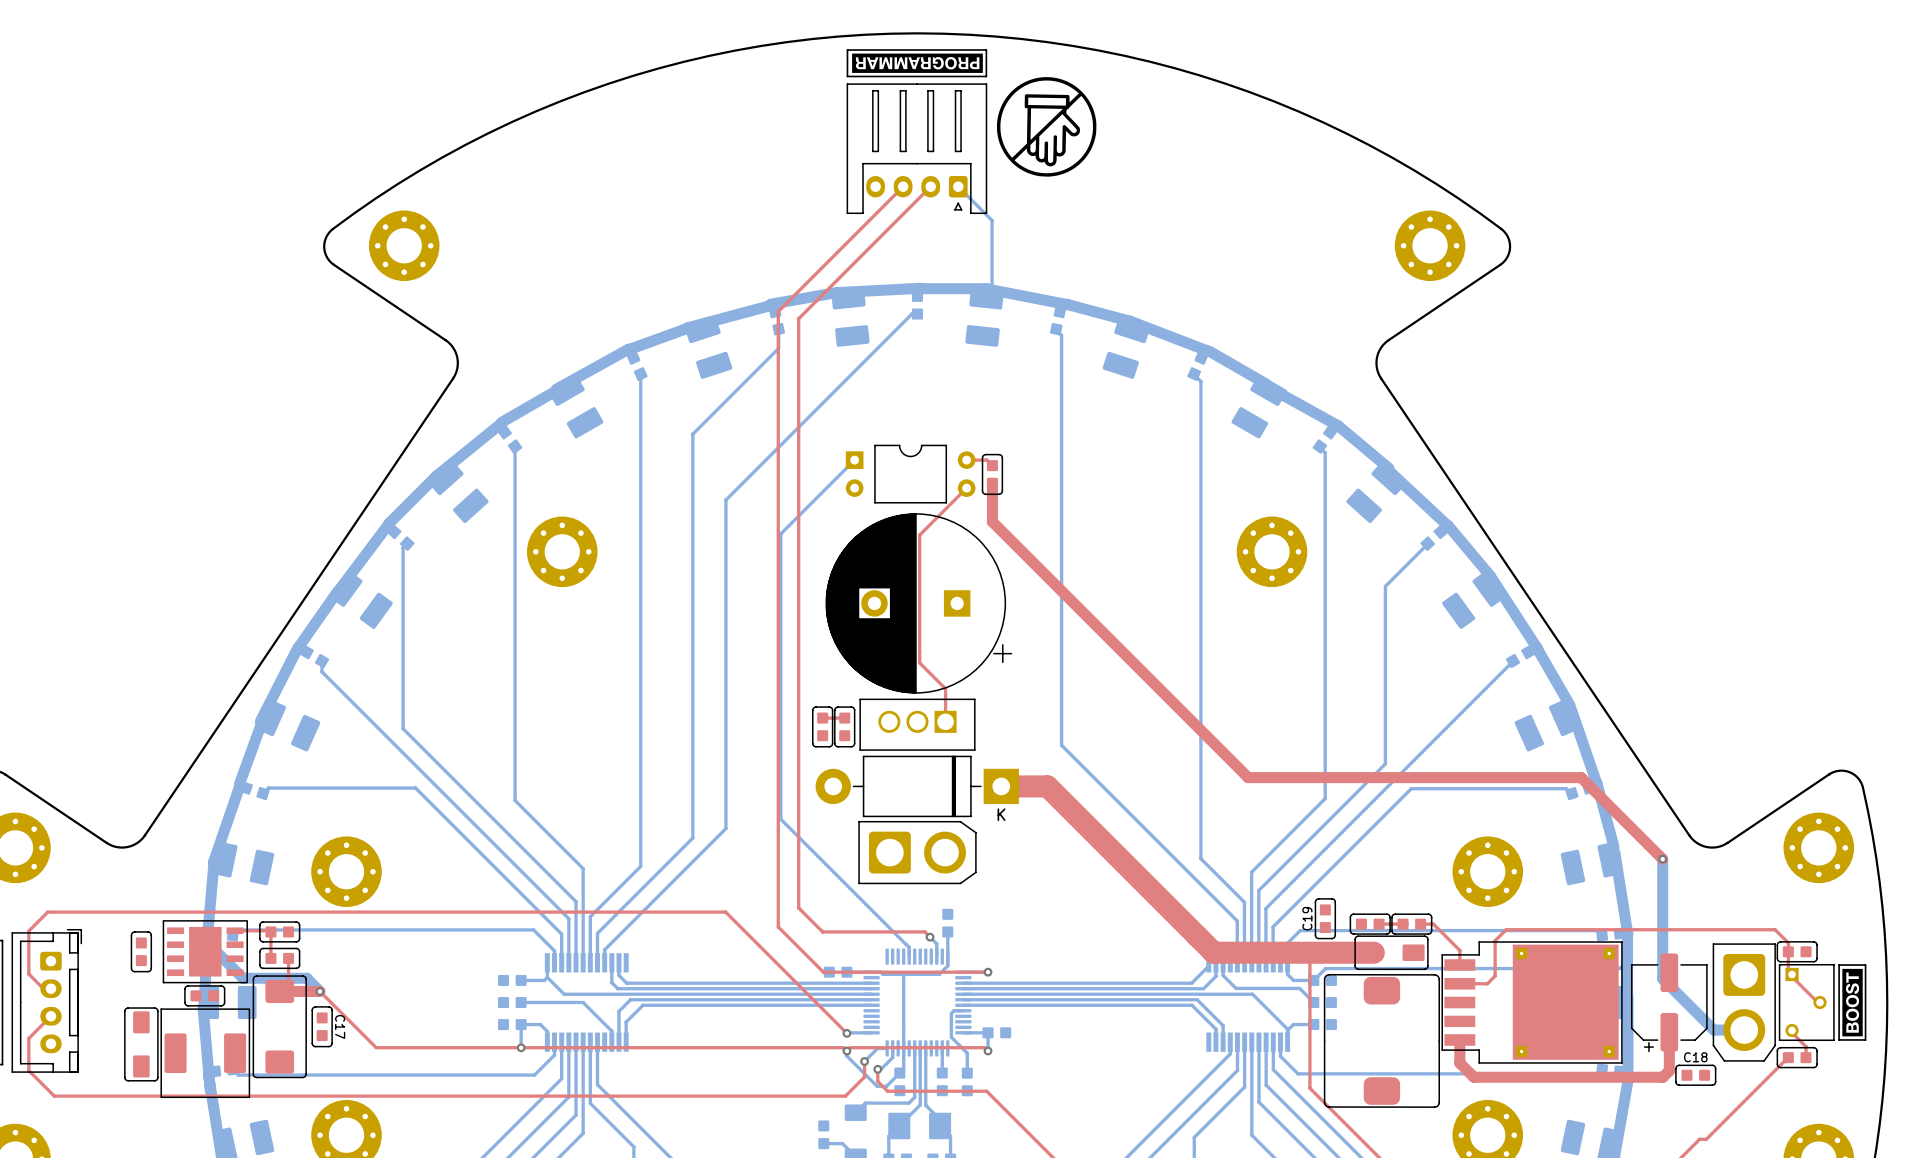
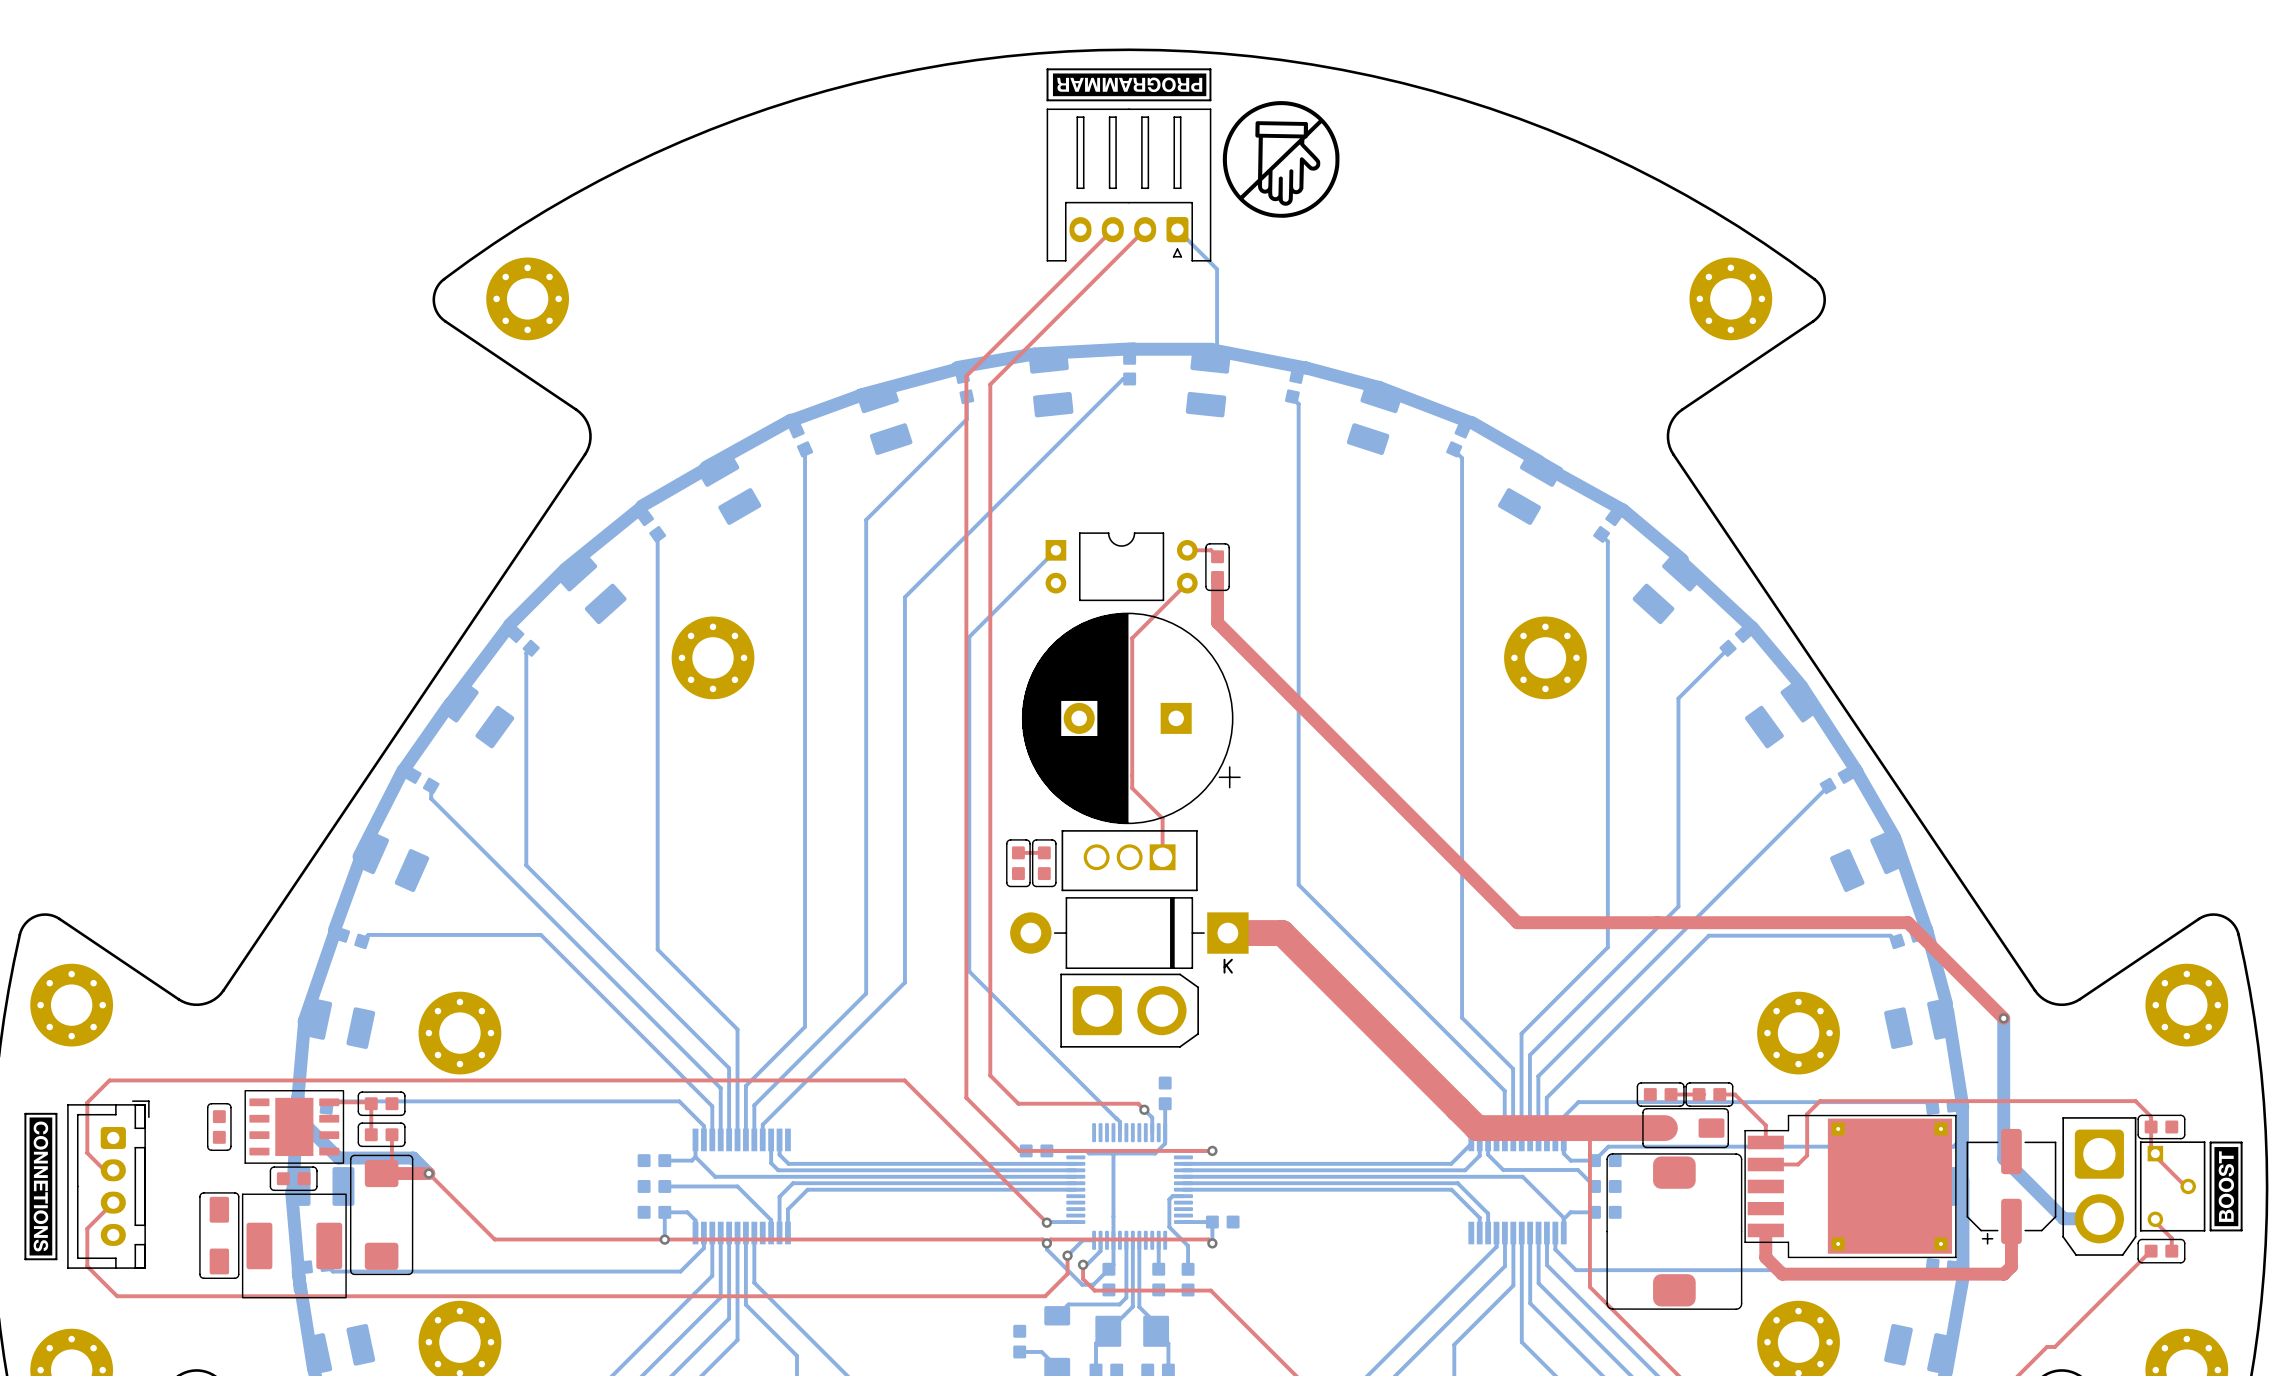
C19: (1325, 918) -> none
C17: (322, 1026) -> none
C18: (1695, 1075) -> none

